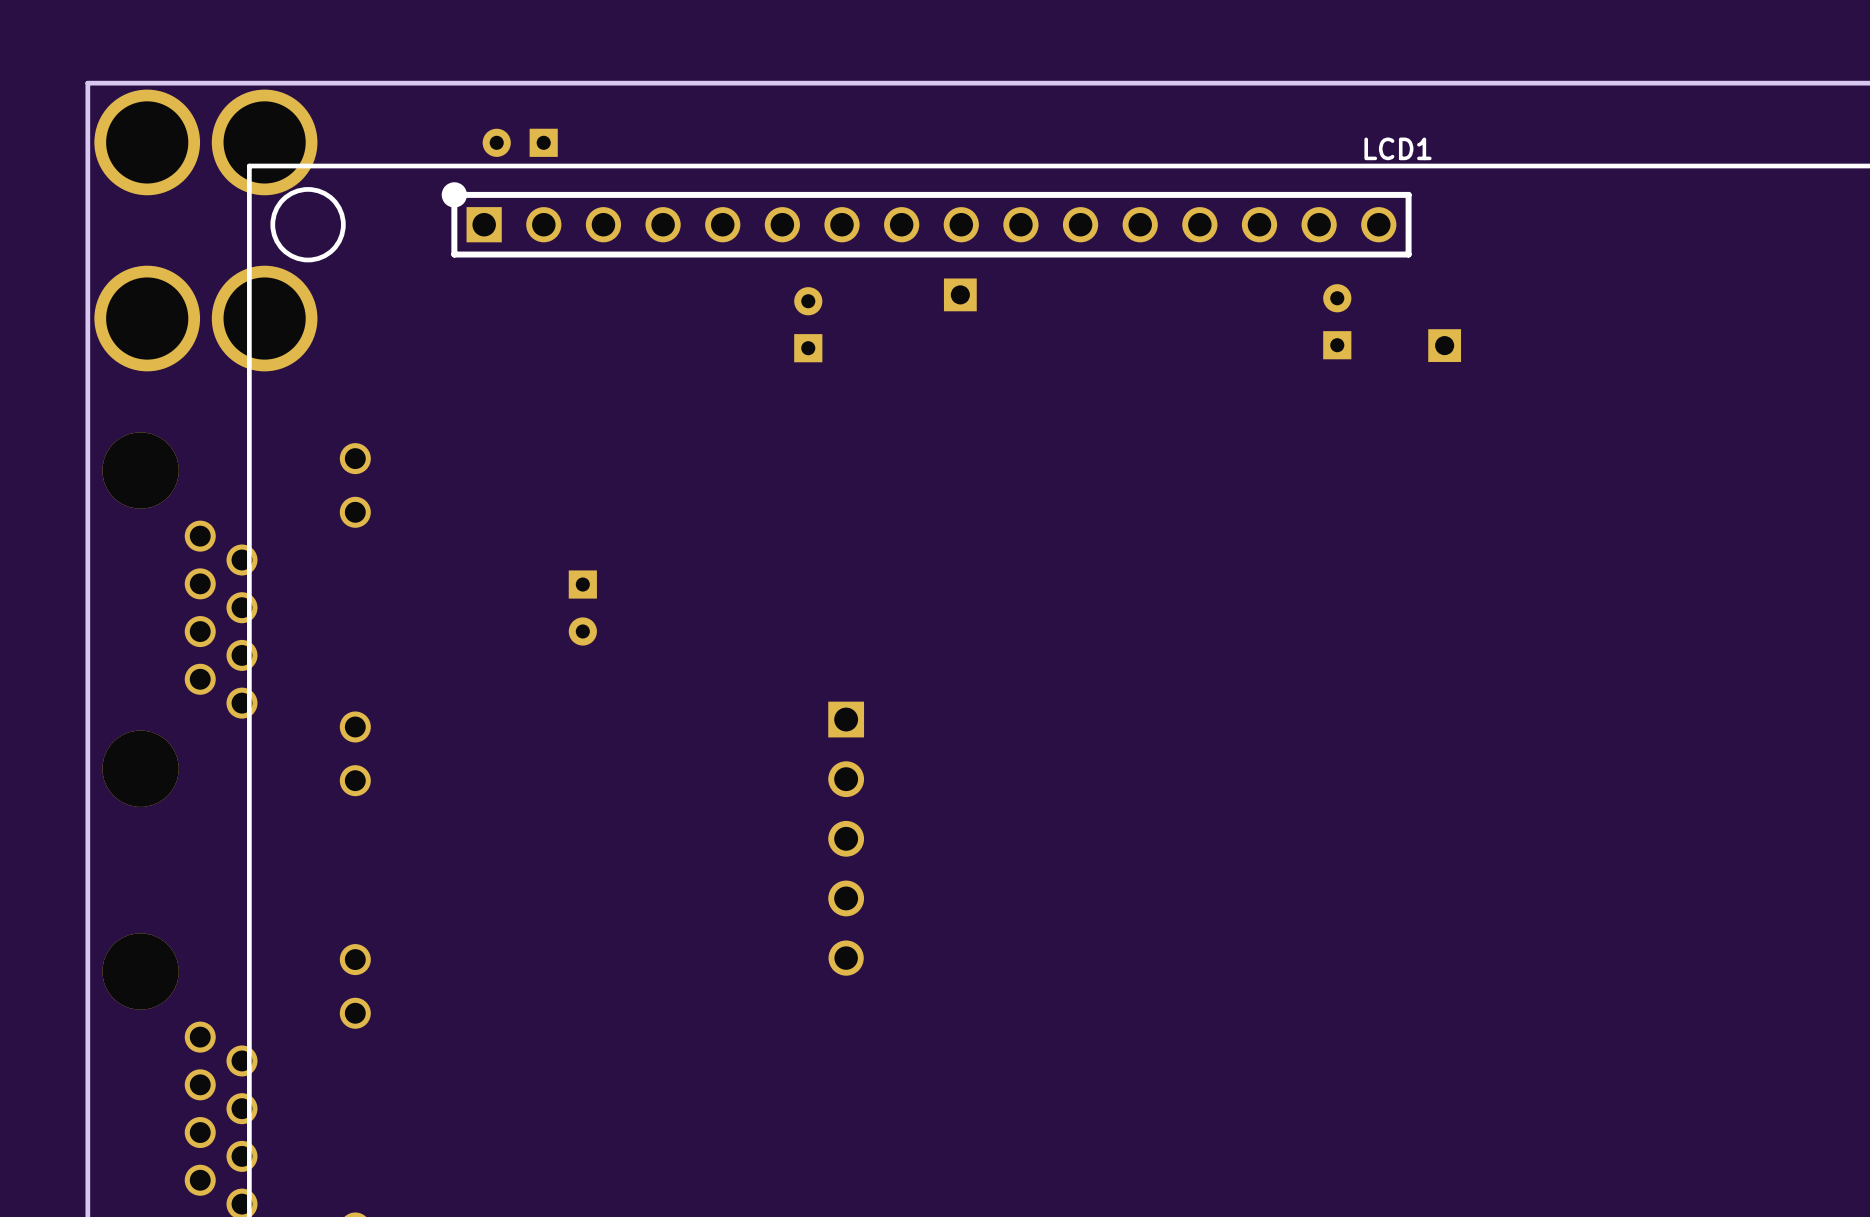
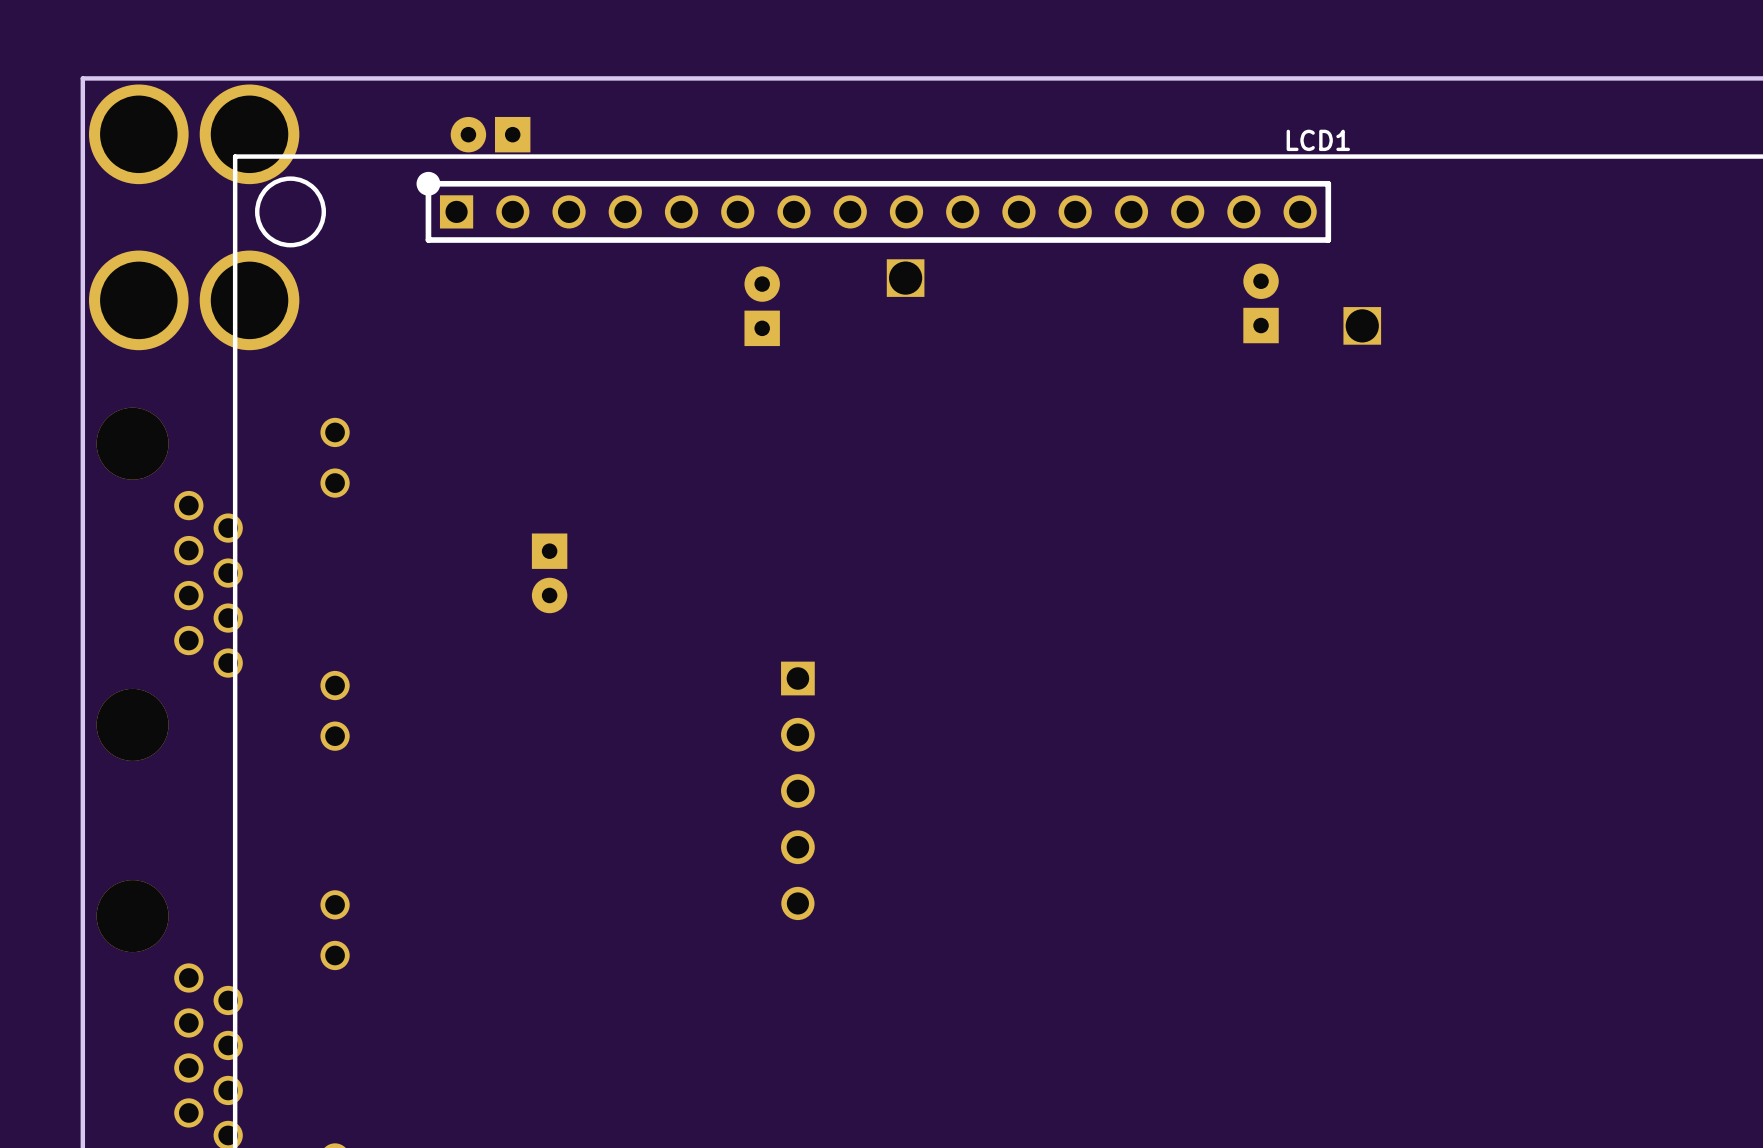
part footprint: [482, 128, 558, 157] -> [450, 116, 531, 153]
part footprint: [943, 278, 977, 312] -> [886, 259, 925, 297]
part footprint: [1323, 284, 1352, 360] -> [1243, 263, 1279, 344]
part footprint: [794, 287, 823, 363] -> [744, 266, 780, 347]
part footprint: [1428, 329, 1462, 362] -> [1343, 307, 1382, 345]
part footprint: [568, 570, 597, 646] -> [531, 533, 568, 614]

